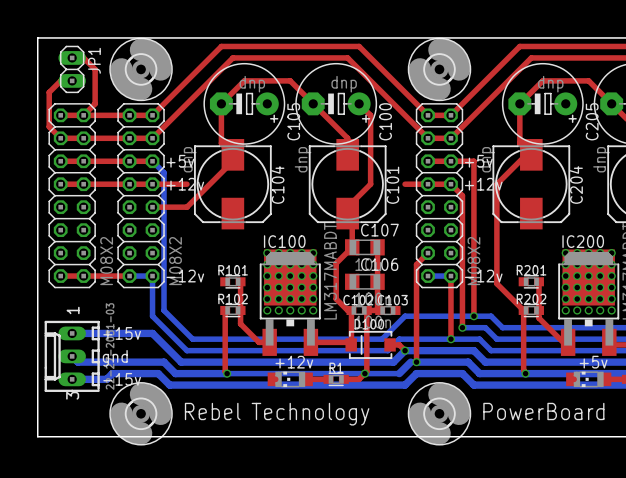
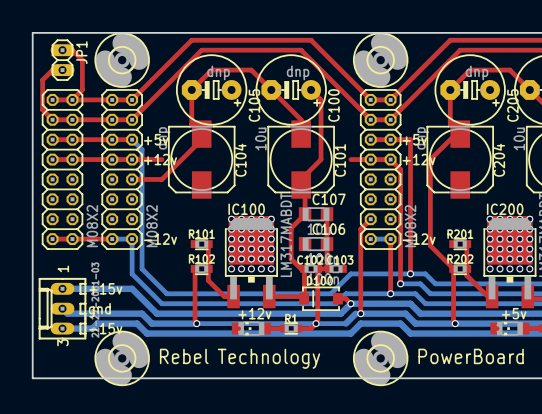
C101 value: dnp (303, 159) -> 10u (260, 139)
part value: dnp (601, 159) -> 10u (519, 139)

